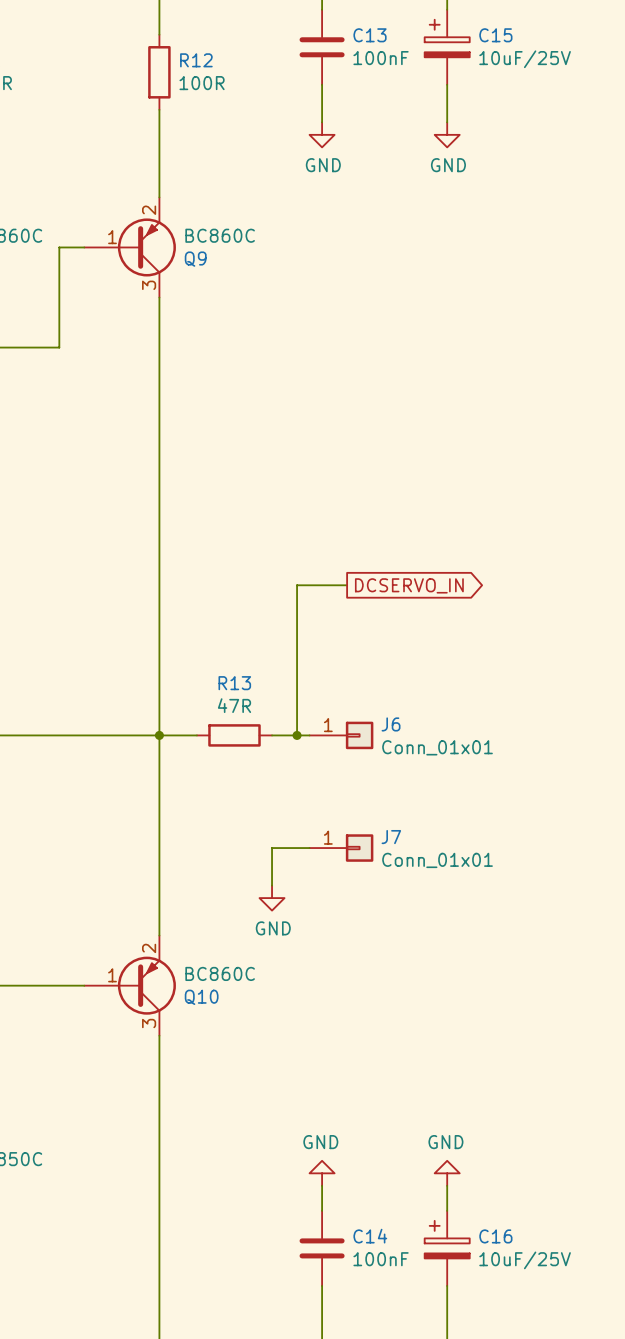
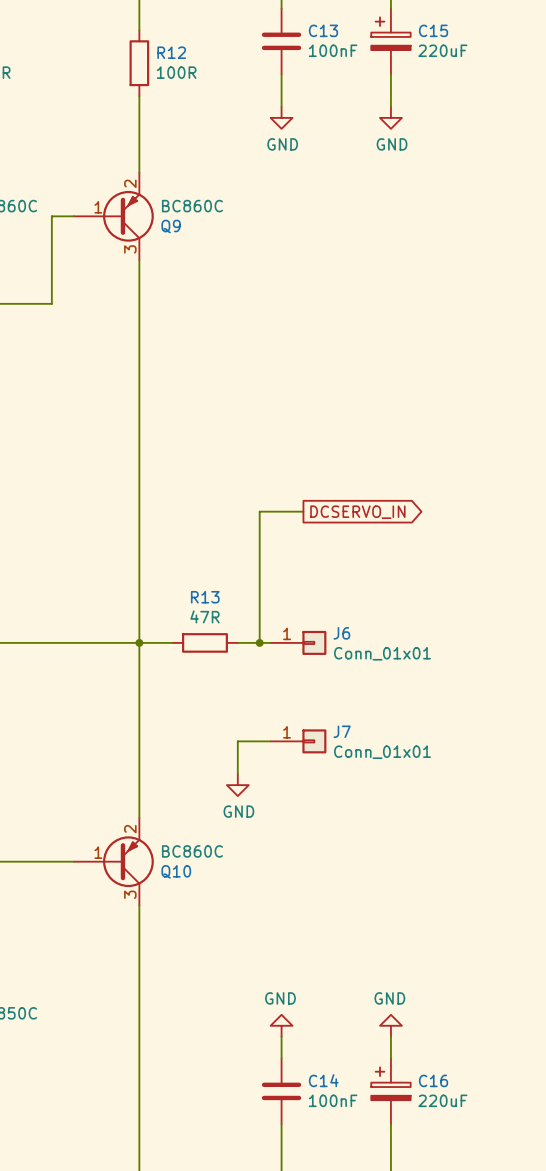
C15 value: 10uF/25V (525, 59) -> 220uF (442, 50)
C16 value: 10uF/25V (525, 1260) -> 220uF (442, 1100)

